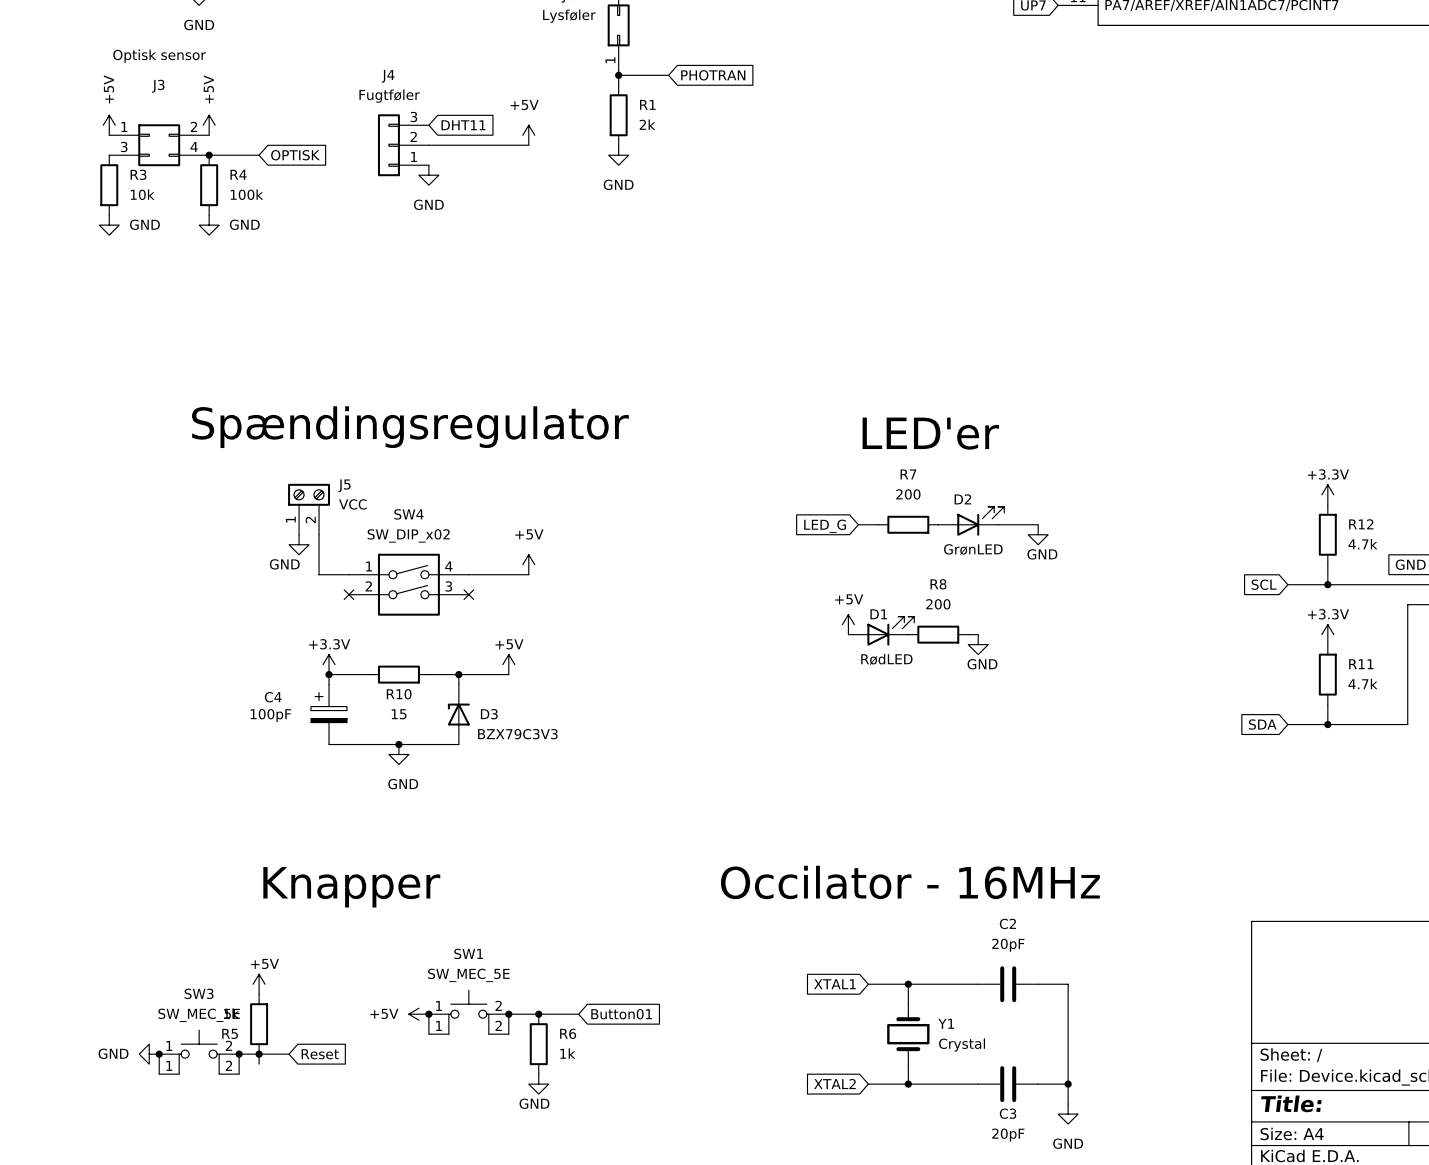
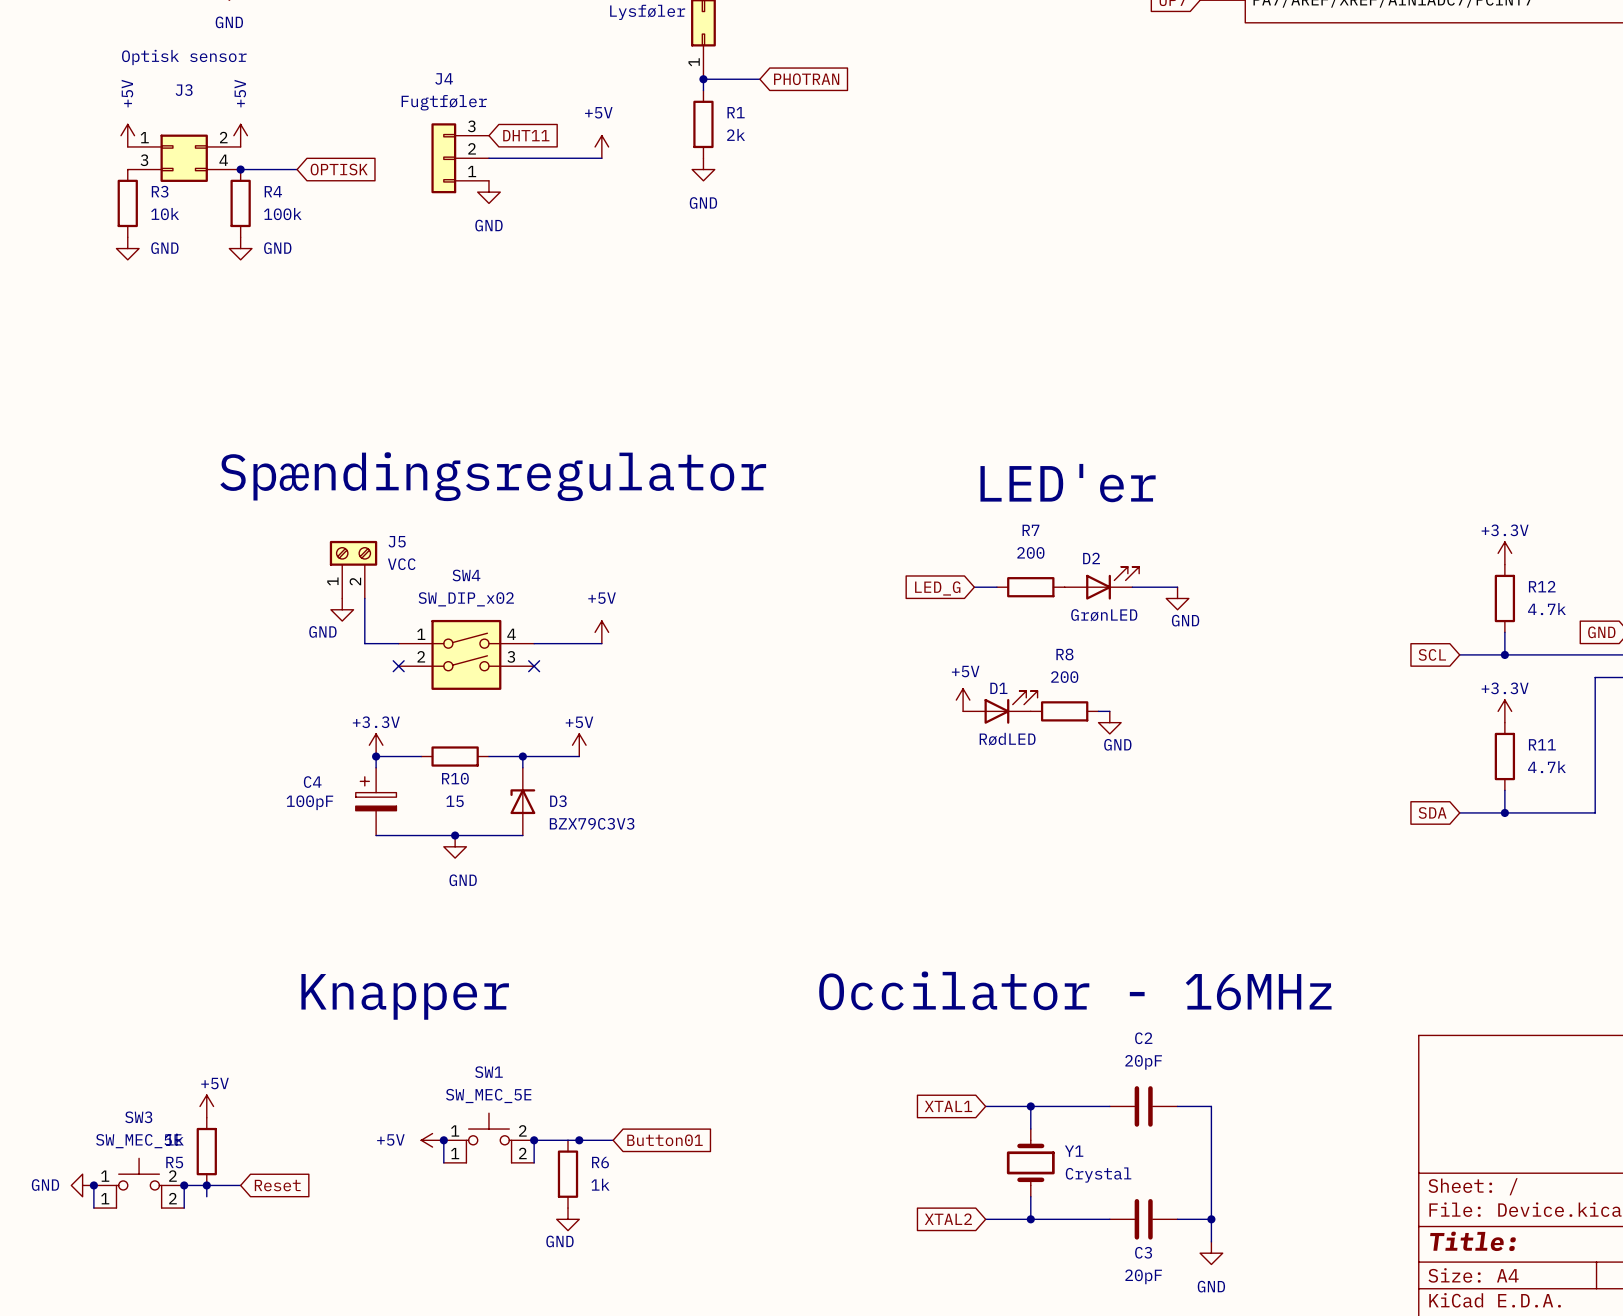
power symbol: none -> +5V (206, 1106)
power symbol: +5V (259, 984) -> none
SW1 position: (468, 1012) -> (488, 1138)
junction: none -> (443, 1140)
power symbol position: +5V (418, 1014) -> +5V (432, 1140)
wire: (428, 1014) (428, 1034) -> (443, 1140) (443, 1162)
junction: (428, 1014) -> none
junction: none -> (534, 1140)
wire: (508, 1014) (508, 1034) -> (579, 1140) (534, 1140) (534, 1162)
wire: (538, 1014) (578, 1014) -> none
junction: (538, 1014) -> none
global label position: Button01 (621, 1014) -> Button01 (664, 1140)
R5 position: (259, 1024) -> (206, 1151)
R6 position: (538, 1044) -> (567, 1174)
SW3 position: (199, 1052) -> (139, 1183)
wire: none -> (93, 1185) (93, 1208)
junction: none -> (93, 1185)
power symbol position: GND (149, 1054) -> GND (82, 1185)
wire: none -> (184, 1185) (240, 1185)
junction: none -> (206, 1185)
junction: (239, 1054) -> none
junction: (259, 1054) -> none
wire: (289, 1054) (239, 1054) (239, 1074) -> none
global label position: Reset (320, 1054) -> Reset (277, 1185)
power symbol position: GND (538, 1084) -> GND (567, 1219)

